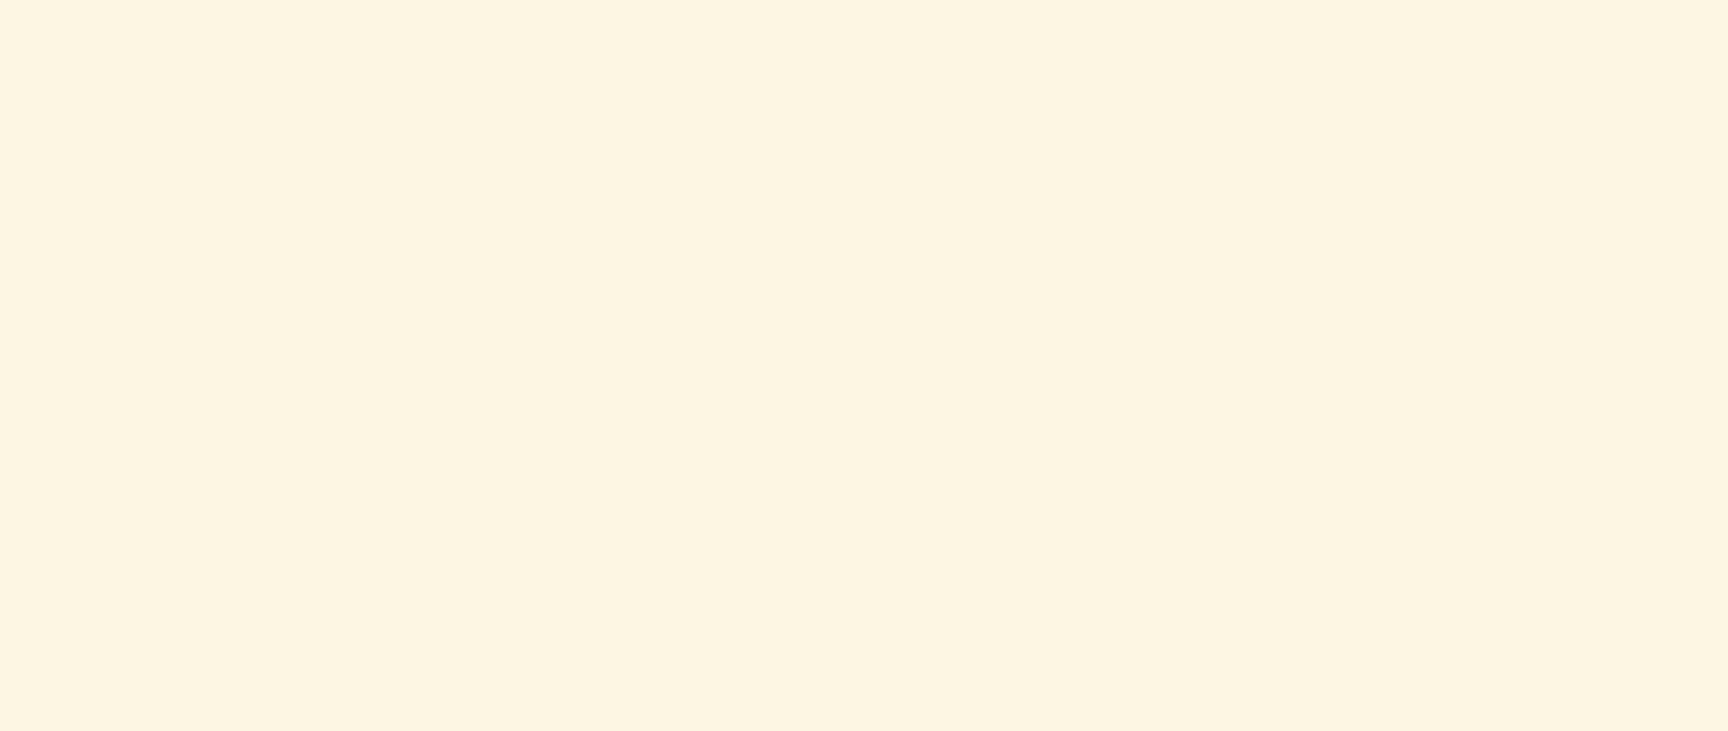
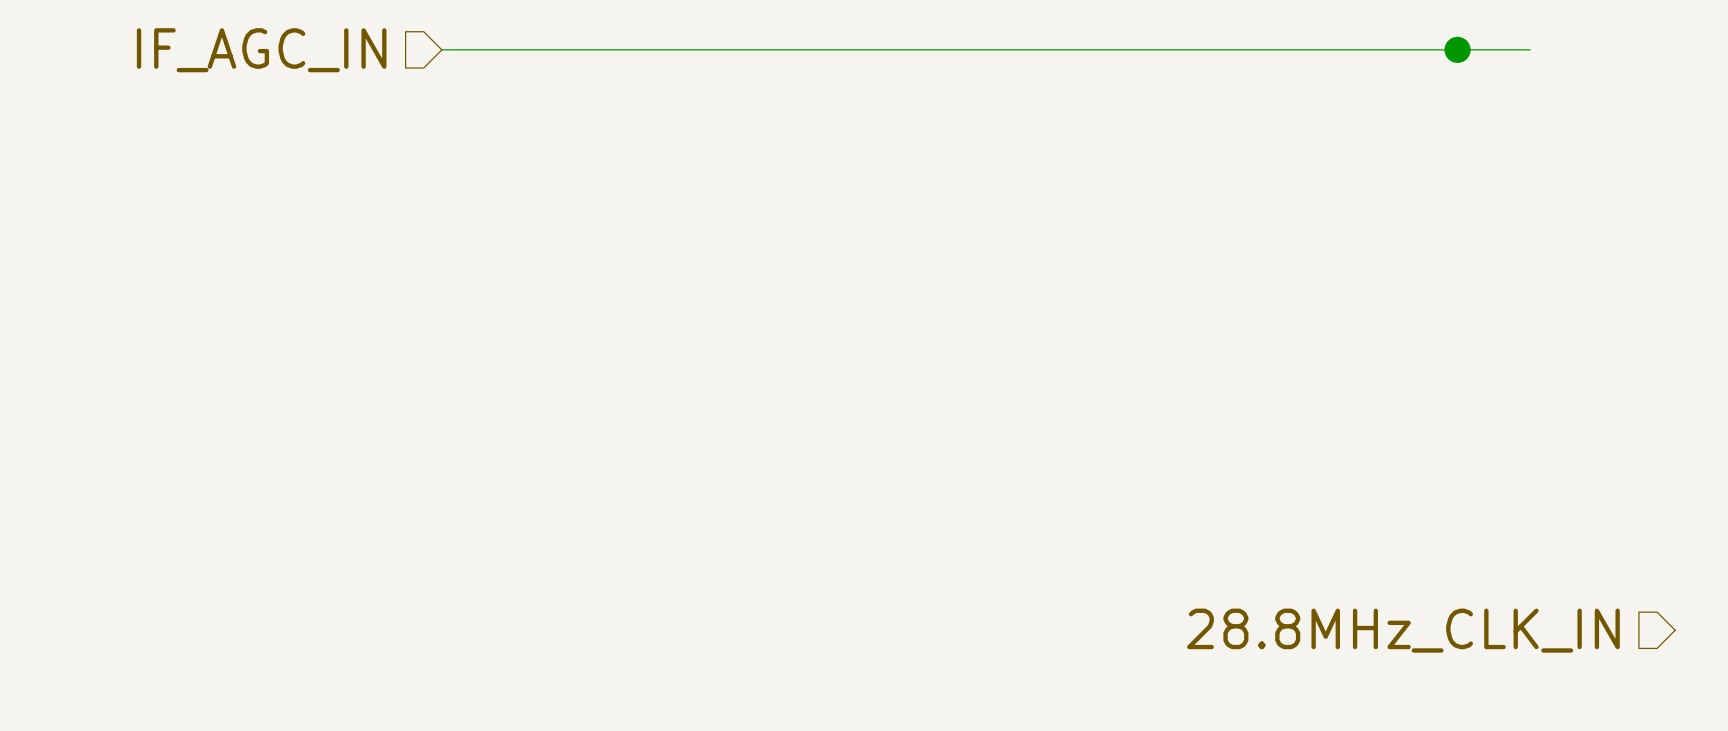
wire: none -> (441, 49) (1530, 49)
junction: none -> (1457, 49)
hierarchical label: none -> IF_AGC_IN (261, 50)
hierarchical label: none -> 28.8MHz_CLK_IN (1403, 630)

